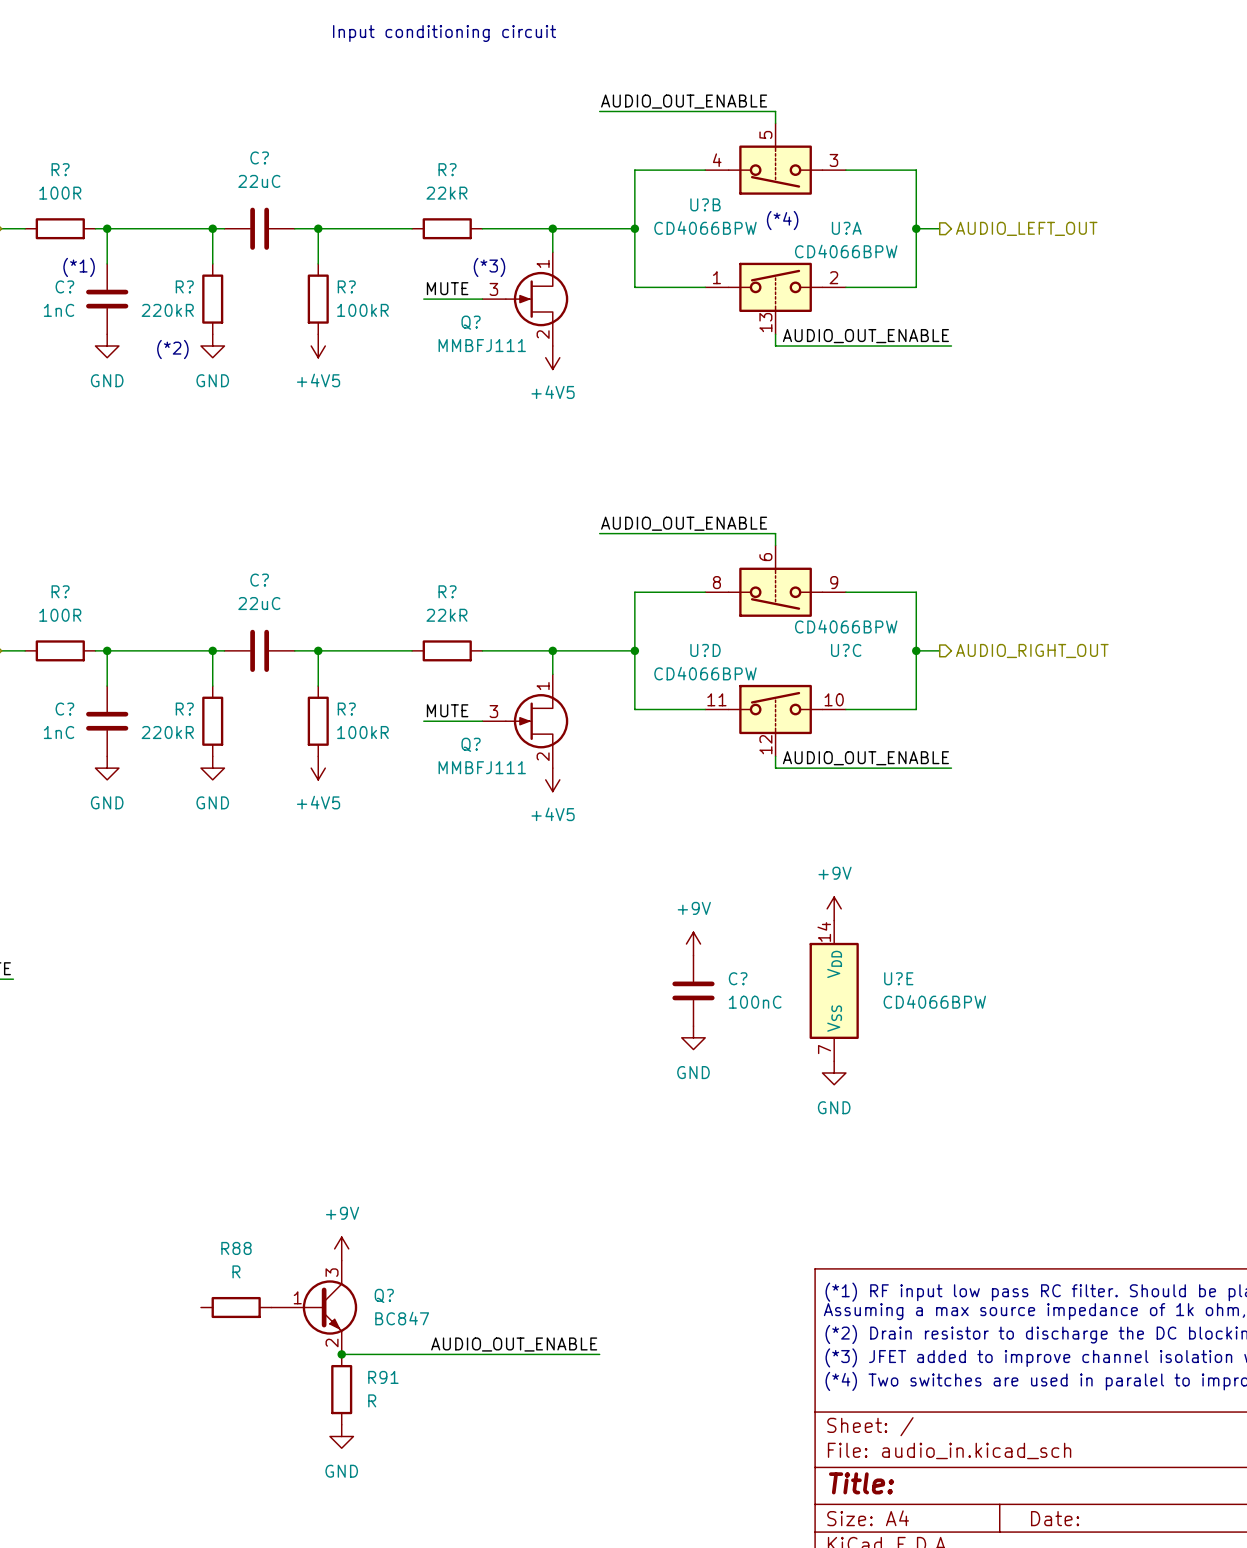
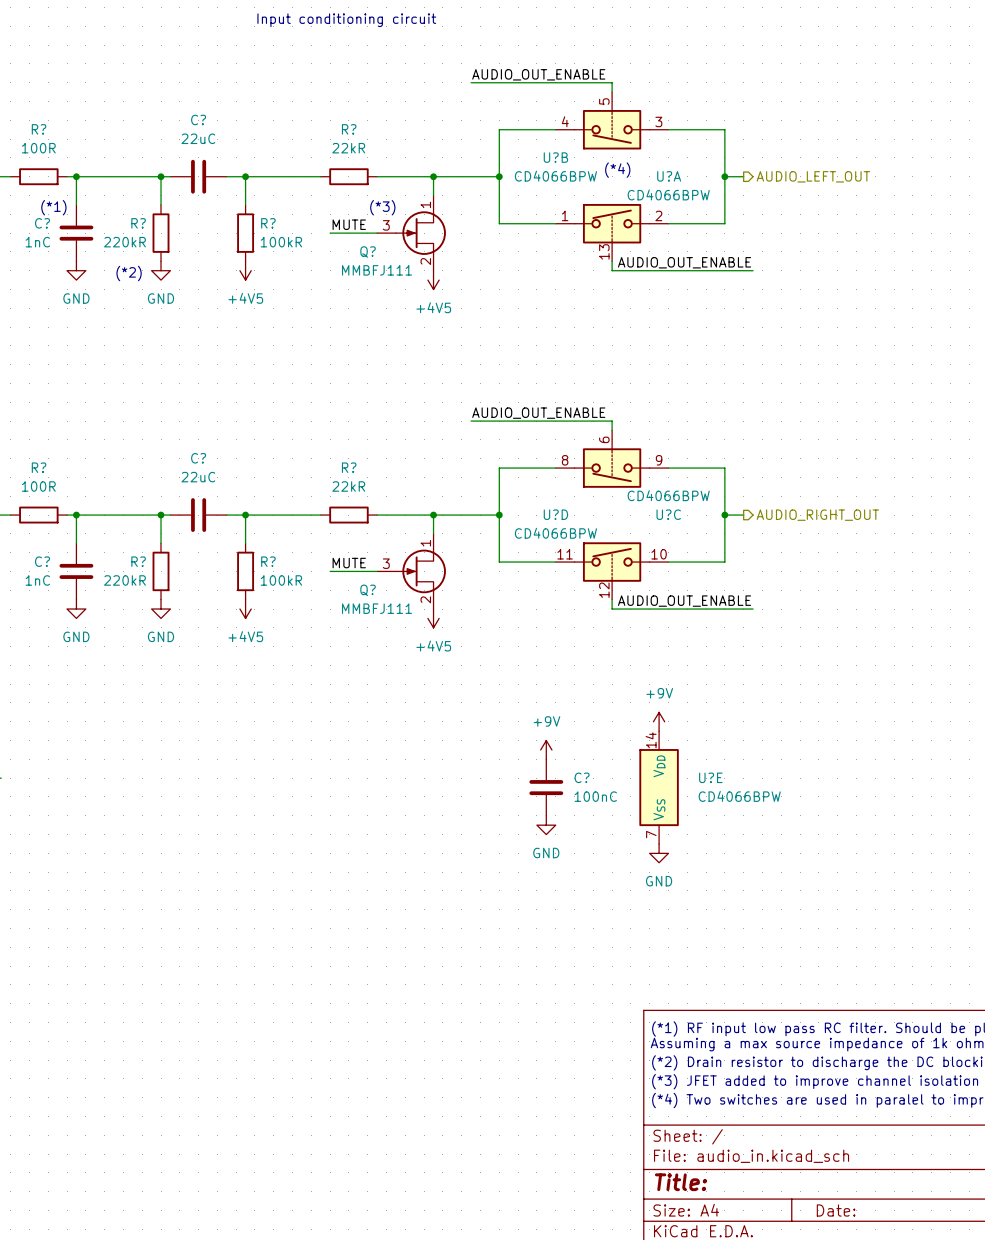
power symbol: +9V (341, 1248) -> none
R88: R (236, 1307) -> none
Q?: BC847 (314, 1307) -> none
label: AUDIO_OUT_ENABLE (514, 1344) -> none
wire: (341, 1354) (599, 1354) -> none
junction: (341, 1354) -> none
R91: R (341, 1389) -> none
power symbol: GND (341, 1436) -> none

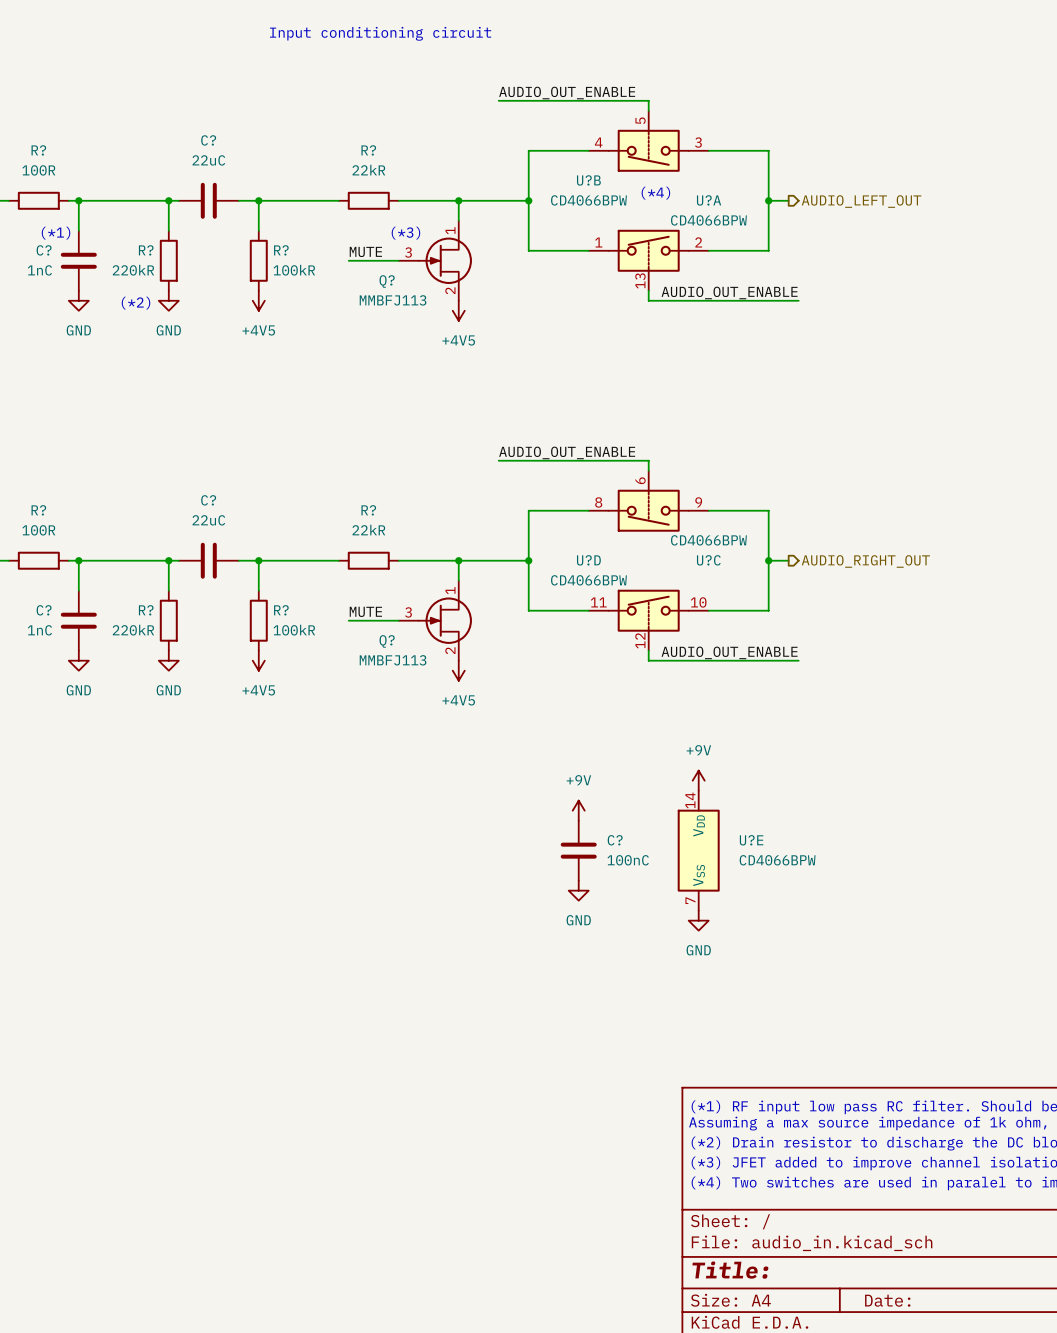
Q? value: MMBFJ111 (376, 270) -> MMBFJ113 (393, 300)
Q? value: MMBFJ111 (376, 608) -> MMBFJ113 (393, 660)

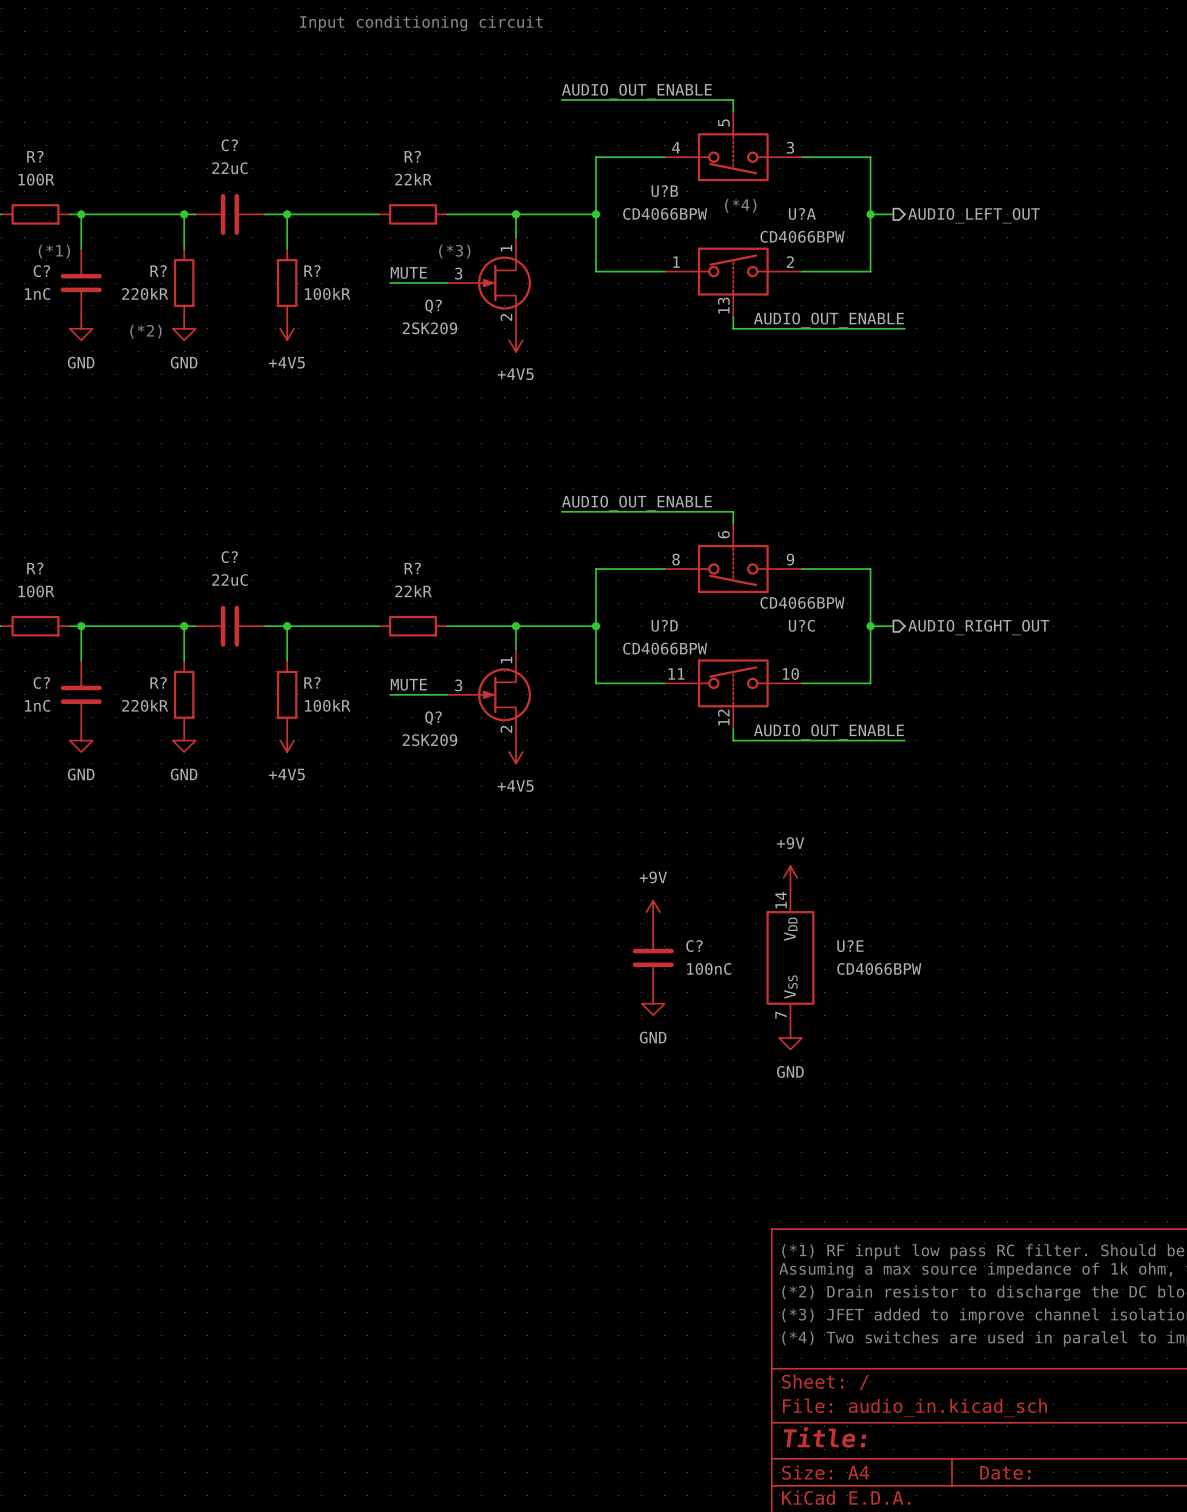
Q? value: MMBFJ113 (393, 300) -> 2SK209 (429, 328)
Q? value: MMBFJ113 (393, 660) -> 2SK209 (429, 740)

